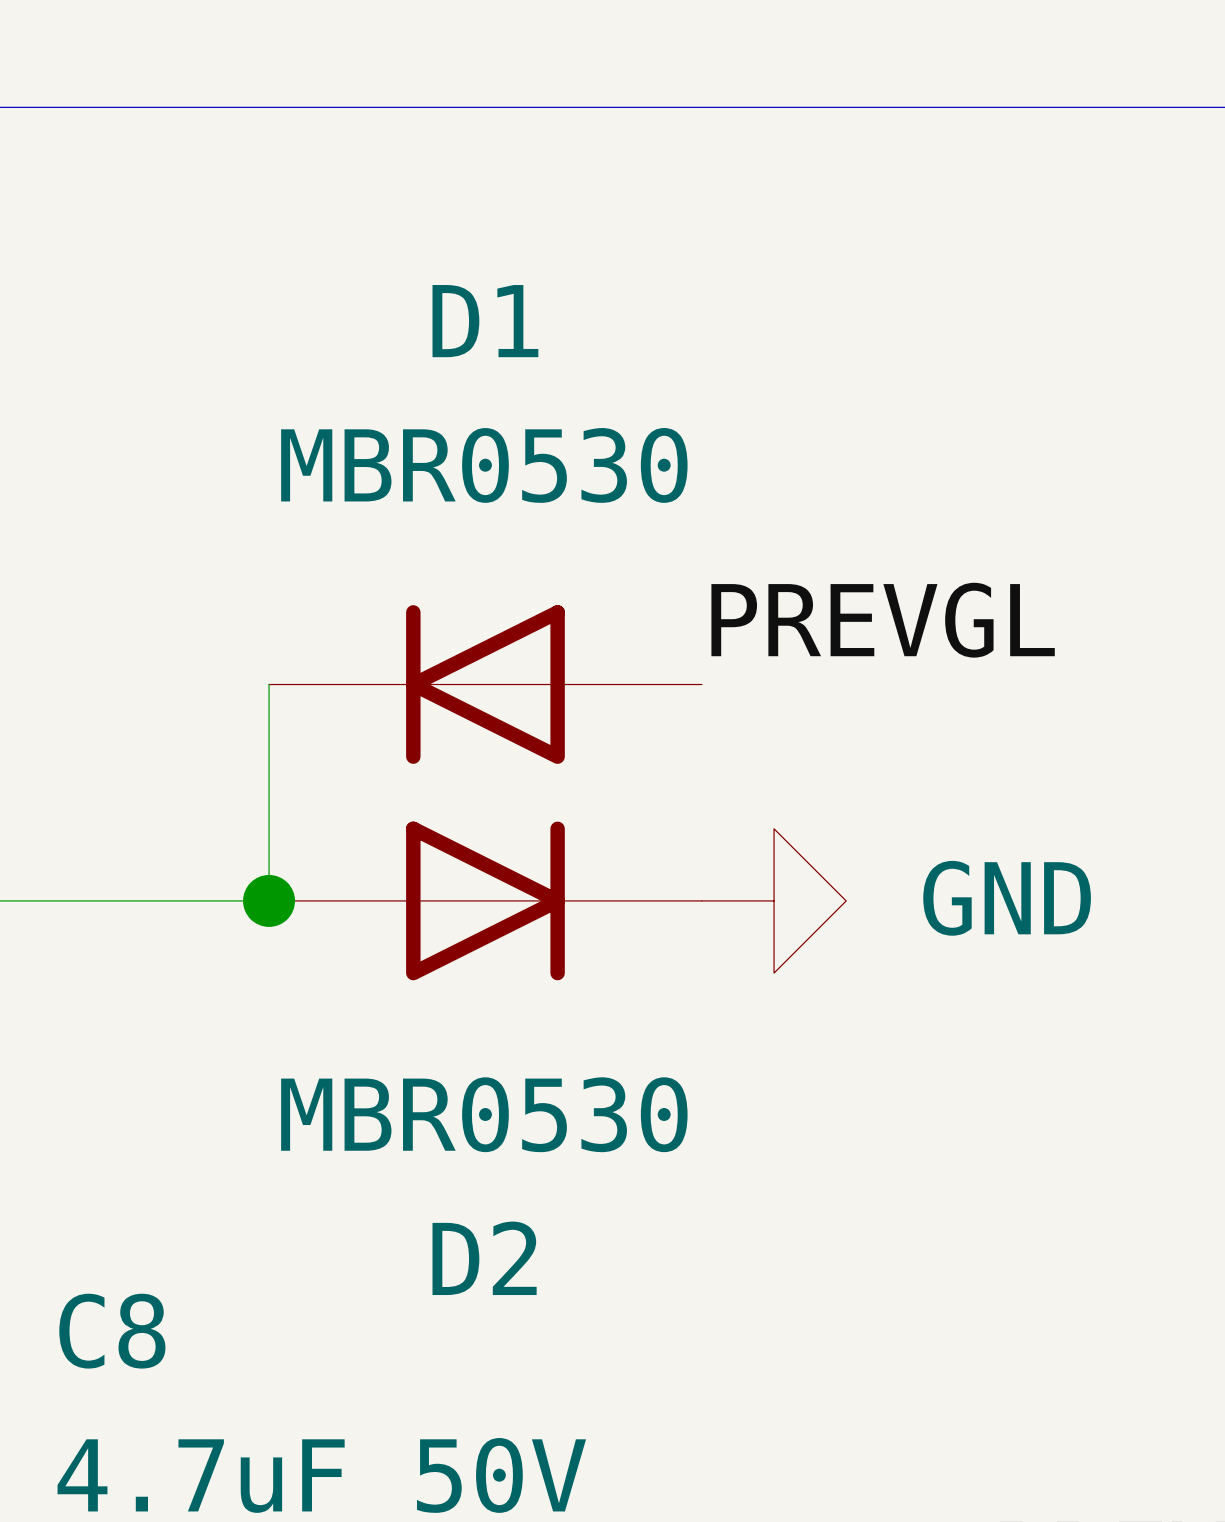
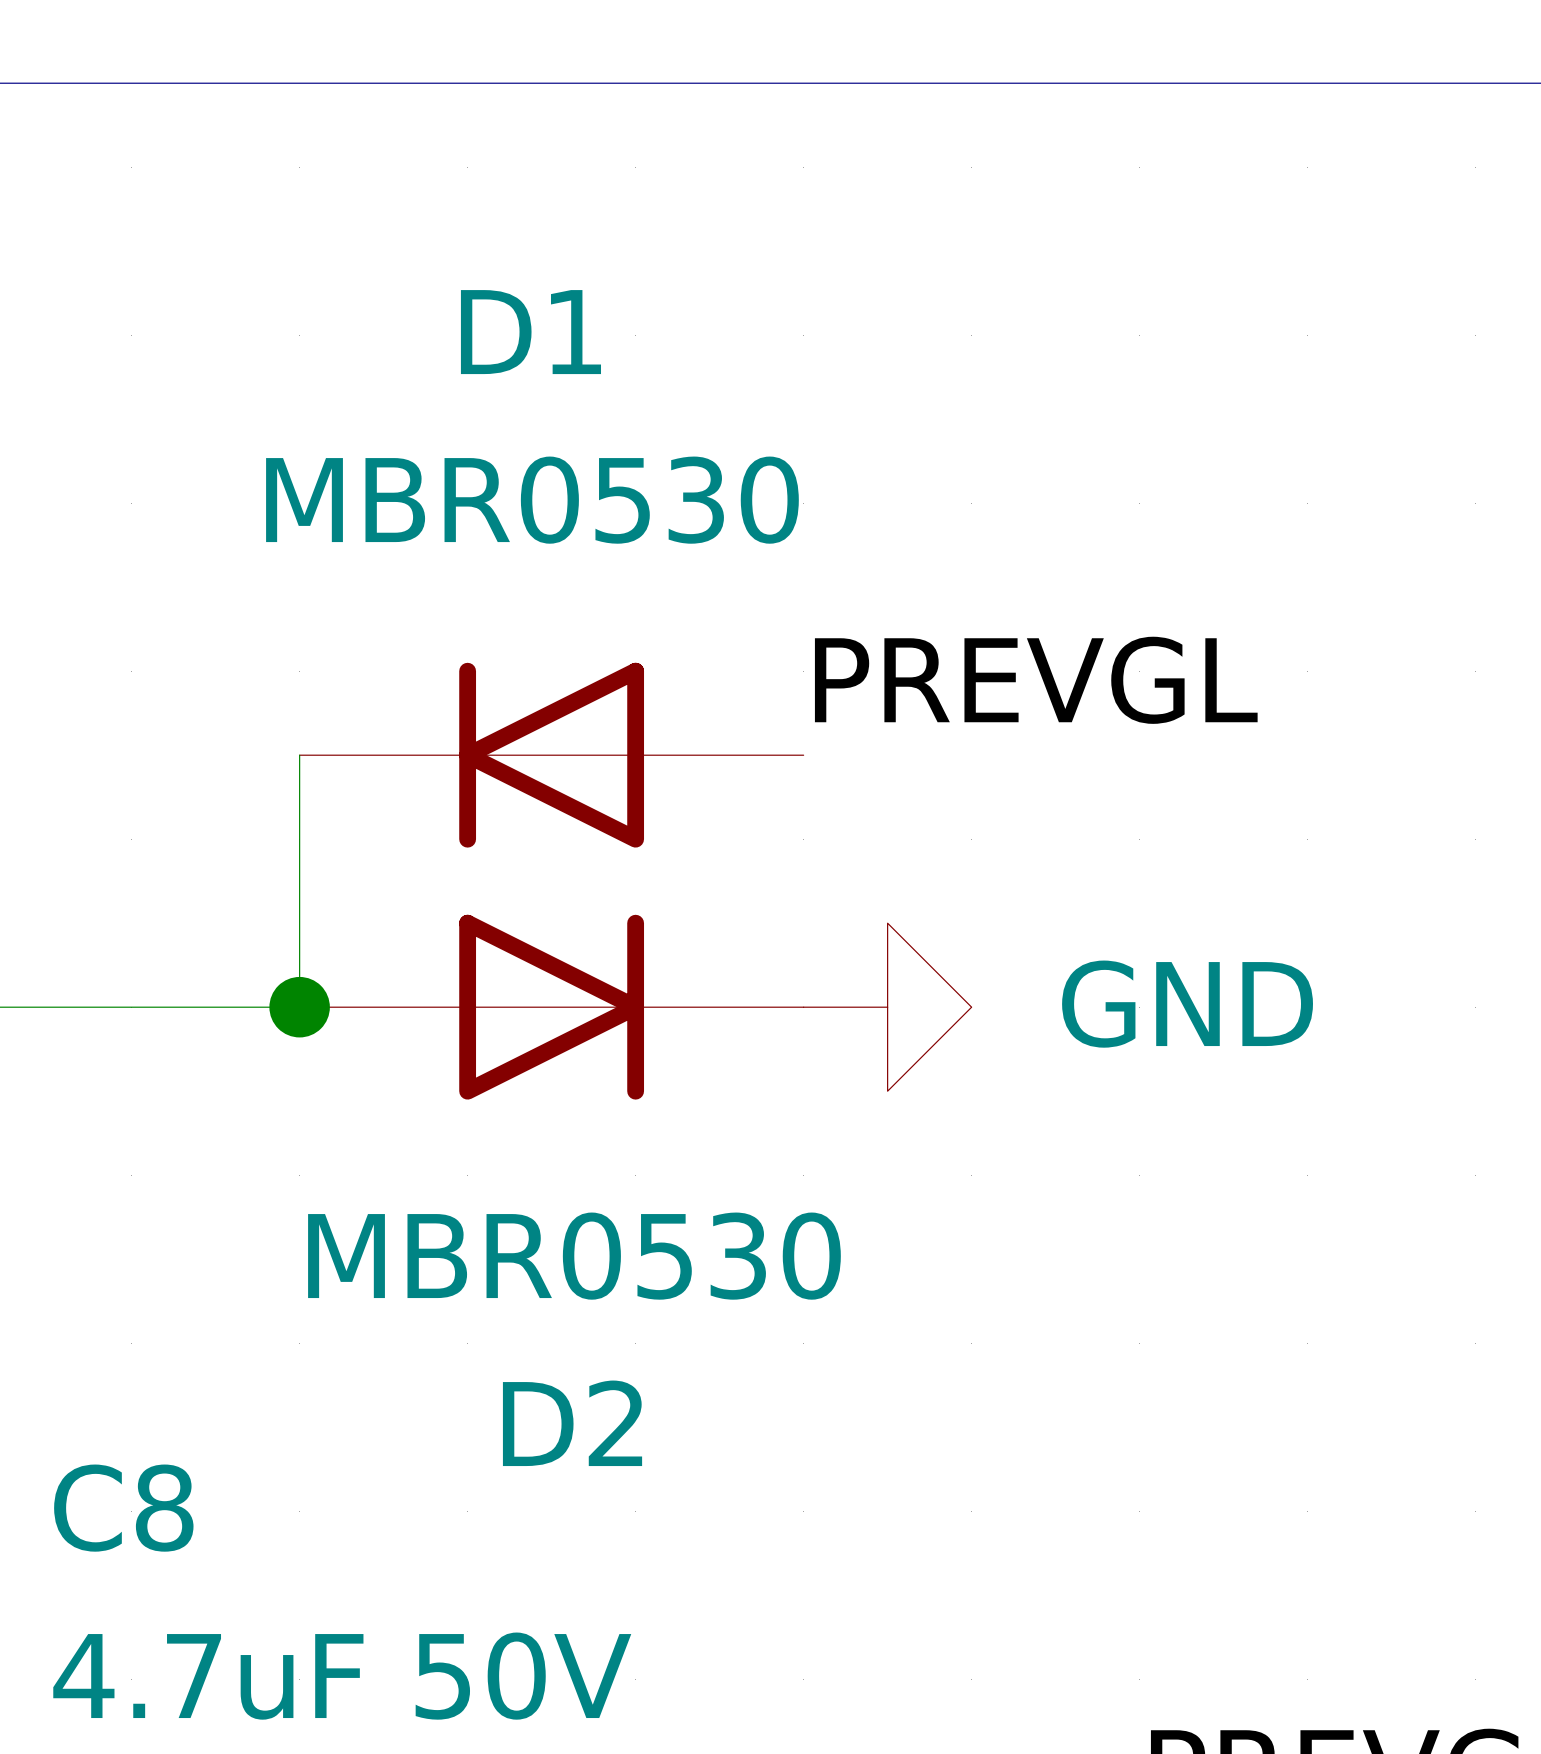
D1 name position: D1 (485, 321) -> D1 (530, 332)
D1 value position: MBR0530 (484, 465) -> MBR0530 (532, 500)
D2 value position: MBR0530 (484, 1114) -> MBR0530 (574, 1256)
D2 name position: D2 (484, 1258) -> D2 (572, 1423)

